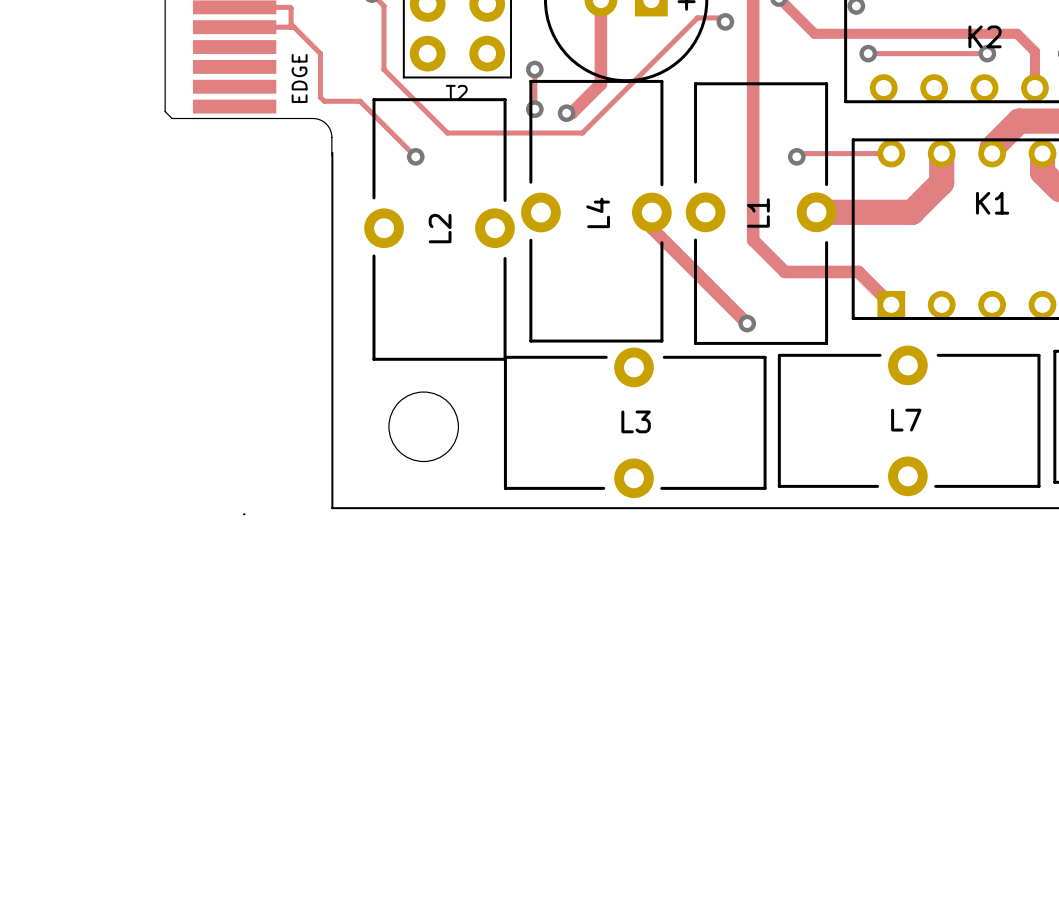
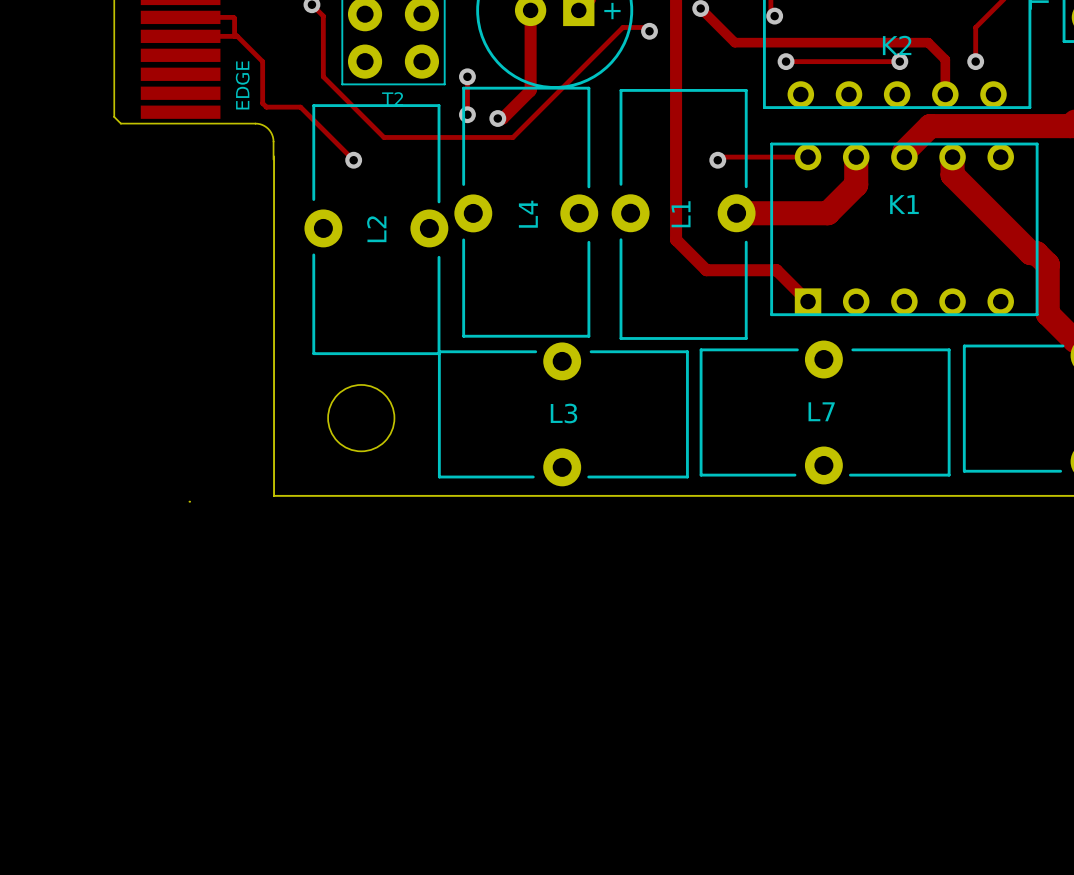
track: (651, 212) (651, 228) (747, 323) -> none
via: (747, 323) -> none

